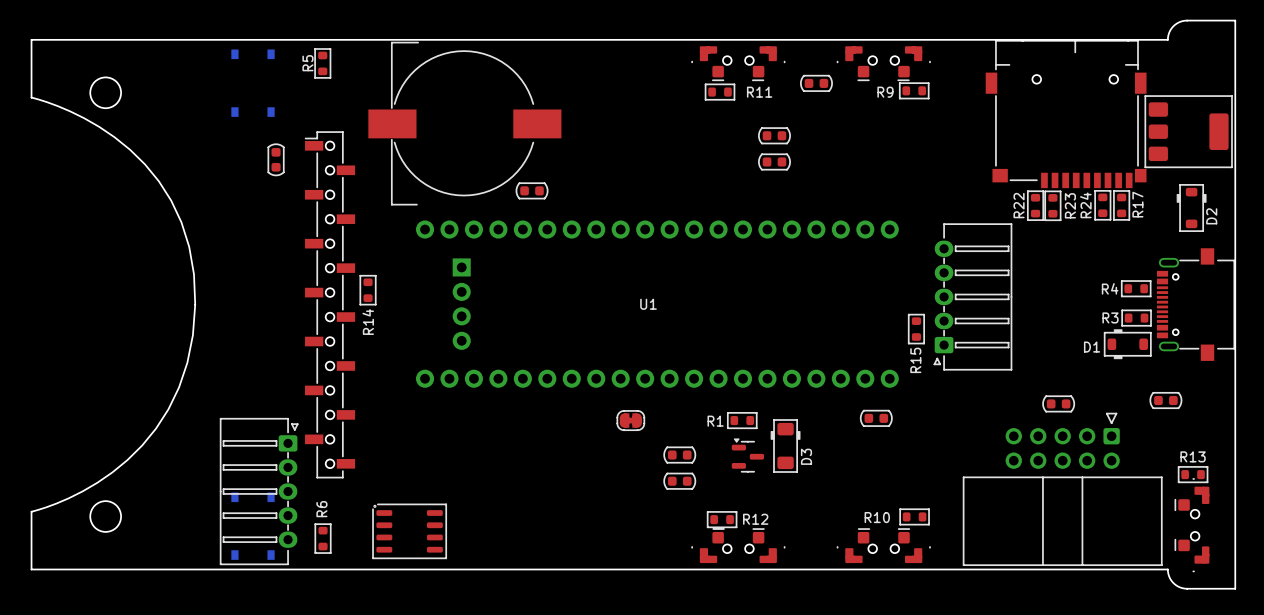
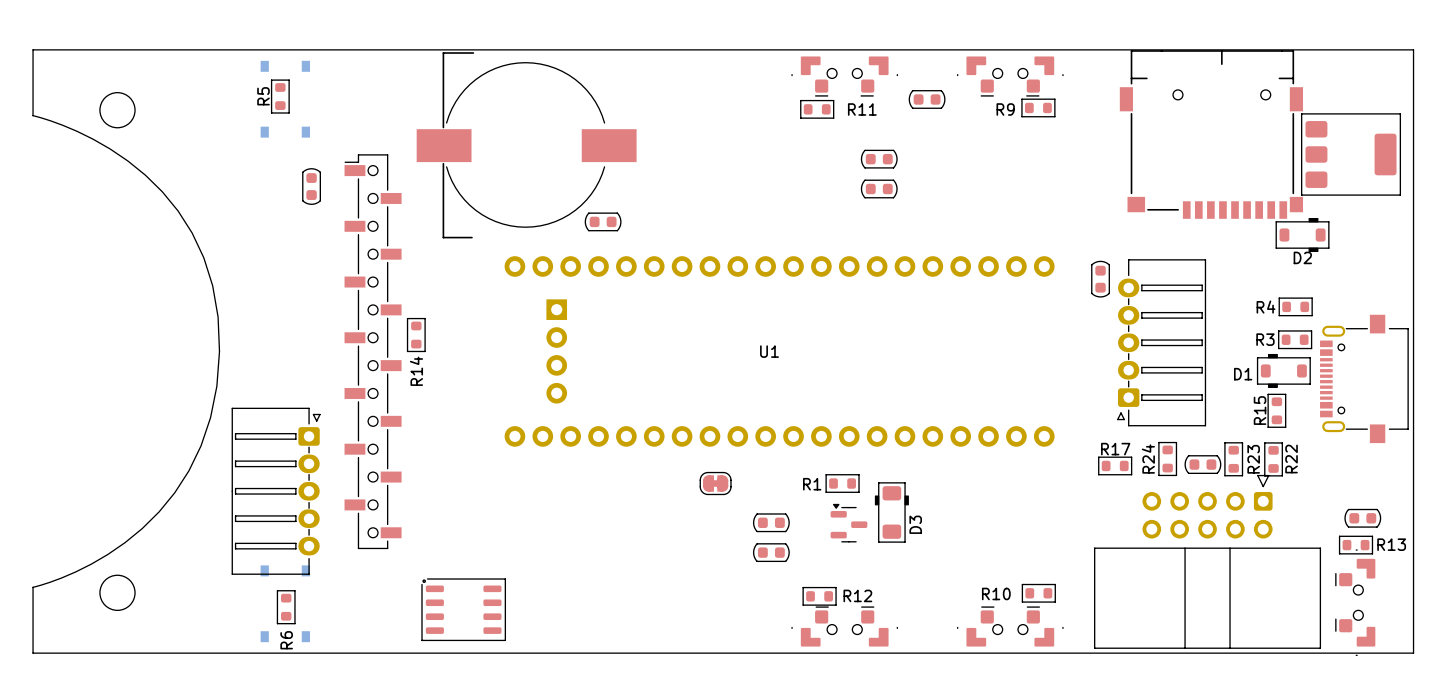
board edge: (1167, 39) (1172, 27) (1182, 21) (1235, 20) (1235, 588) (1182, 588) (1172, 581) (1167, 569) (31, 569) -> (1327, 49) (1413, 49) (1413, 653) (33, 653)
part footprint: [691, 46, 786, 81] -> [791, 56, 899, 97]
part footprint: [836, 46, 931, 81] -> [957, 56, 1064, 97]
R5 position: (322, 63) -> (280, 96)
R17 name position: R17 (1137, 204) -> R17 (1115, 449)
R22 name position: R22 (1019, 205) -> R22 (1291, 459)
R22 position: (1035, 205) -> (1273, 459)
R23 position: (1052, 205) -> (1233, 459)
R24 position: (1102, 205) -> (1167, 458)
R17 rotation: 0° (1121, 205) -> 90° clockwise (1115, 465)
R17 position: (1121, 205) -> (1115, 465)
D2 rotation: 0° (1191, 208) -> 90° clockwise (1302, 235)
D2 position: (1191, 208) -> (1302, 235)
part: none -> (1100, 279)
R4 position: (1136, 288) -> (1295, 306)
part position: (972, 296) -> (1161, 342)
U1 position: (657, 304) -> (779, 351)
part position: (1195, 304) -> (1364, 378)
R3 position: (1136, 318) -> (1295, 339)
R15 position: (916, 329) -> (1276, 410)
D1 position: (1127, 344) -> (1283, 370)
R15 name position: R15 (915, 360) -> R15 (1260, 410)
part position: (1165, 400) -> (1362, 518)
part: (876, 418) -> none
R13 name position: R13 (1193, 456) -> R13 (1391, 544)
part footprint: [1174, 478, 1210, 572] -> [1335, 549, 1376, 656]
part position: (259, 491) -> (276, 491)
R6 name position: R6 (321, 509) -> R6 (286, 640)
part footprint: [691, 528, 786, 564] -> [791, 606, 899, 647]
part footprint: [836, 528, 931, 564] -> [957, 606, 1064, 647]
R6 position: (323, 538) -> (286, 607)

